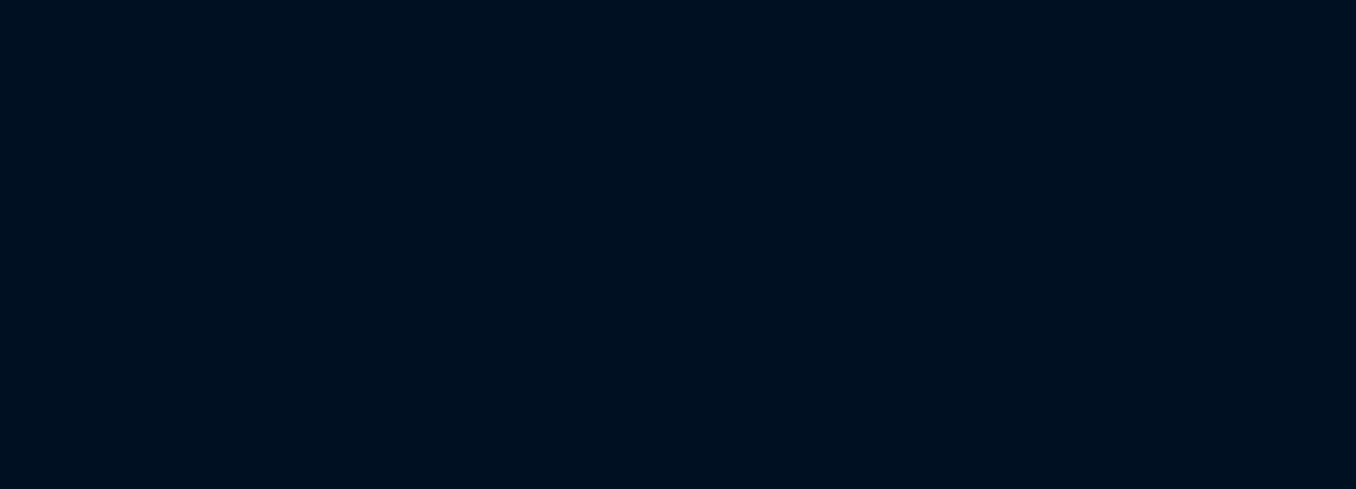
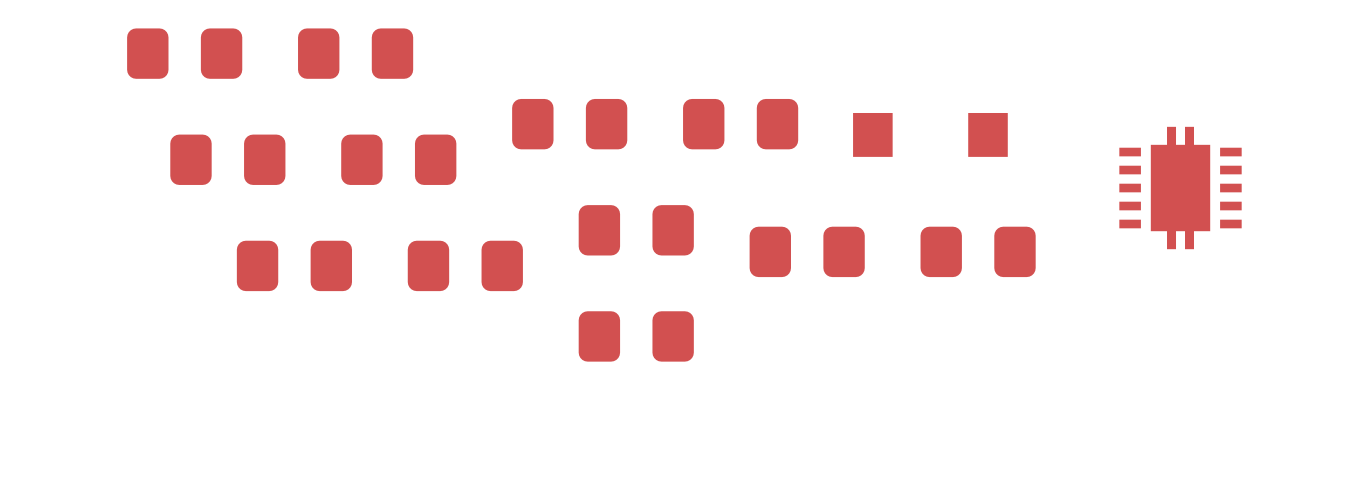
part: none -> (184, 53)
part: none -> (355, 53)
part: none -> (569, 124)
part: none -> (740, 124)
part: none -> (930, 134)
part: none -> (227, 159)
part: none -> (398, 159)
part: none -> (1180, 188)
part: none -> (636, 230)
part: none -> (807, 251)
part: none -> (978, 251)
part: none -> (294, 265)
part: none -> (465, 265)
part: none -> (636, 336)

